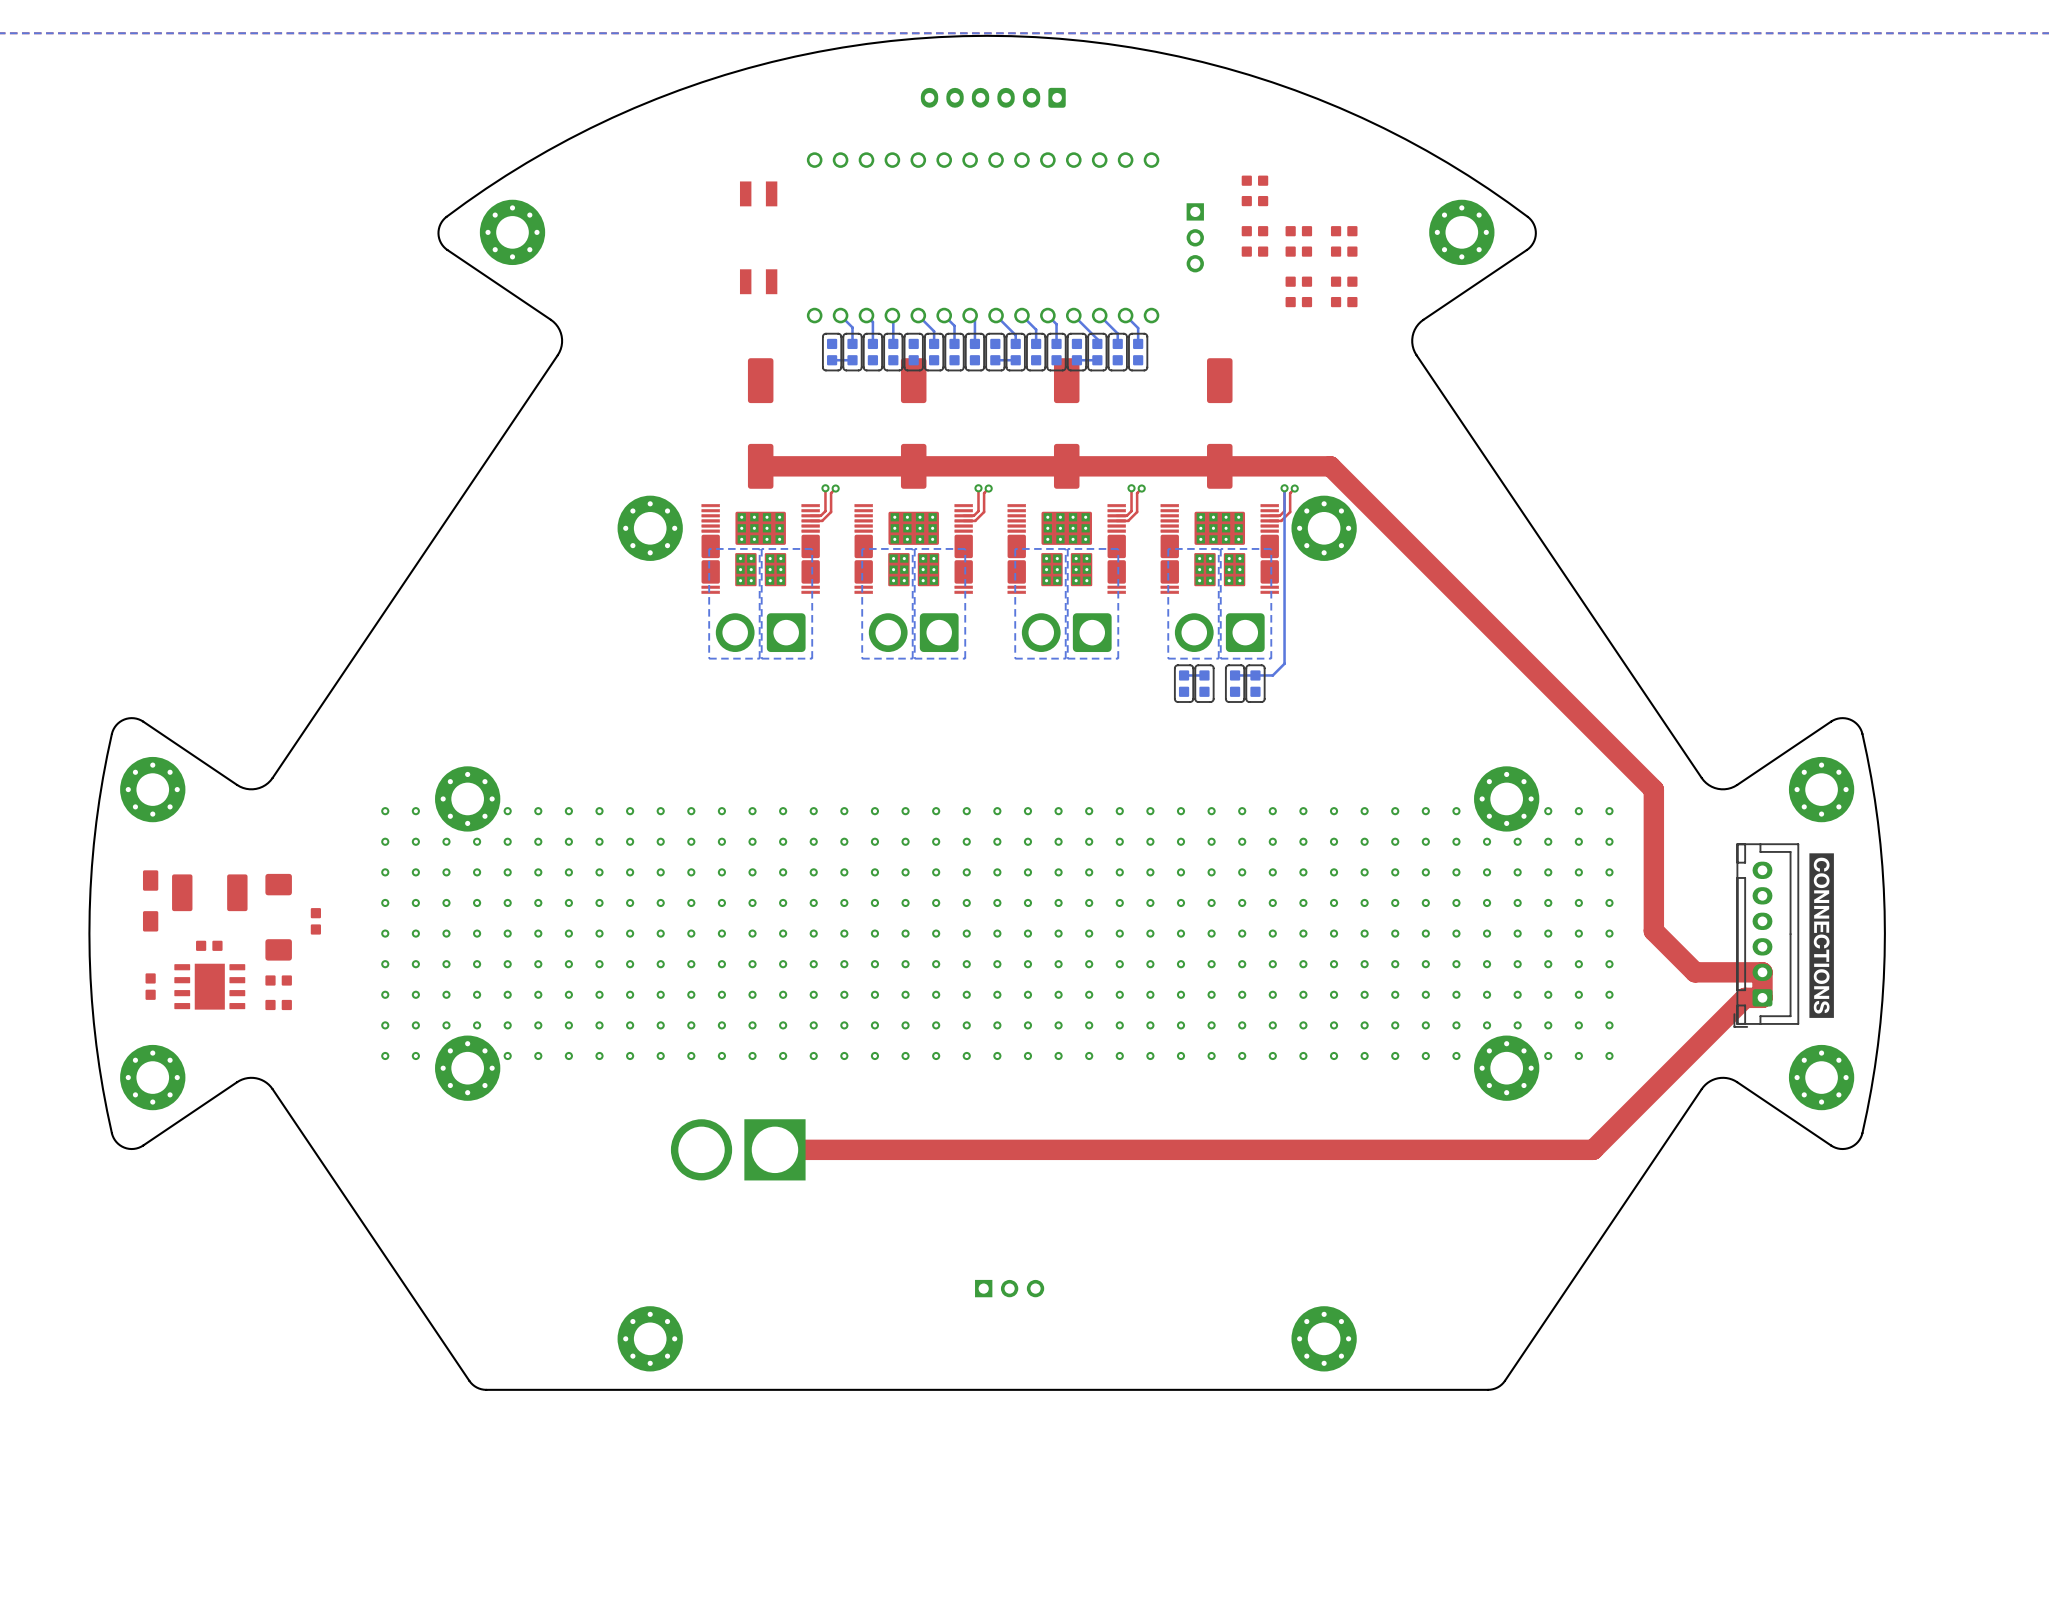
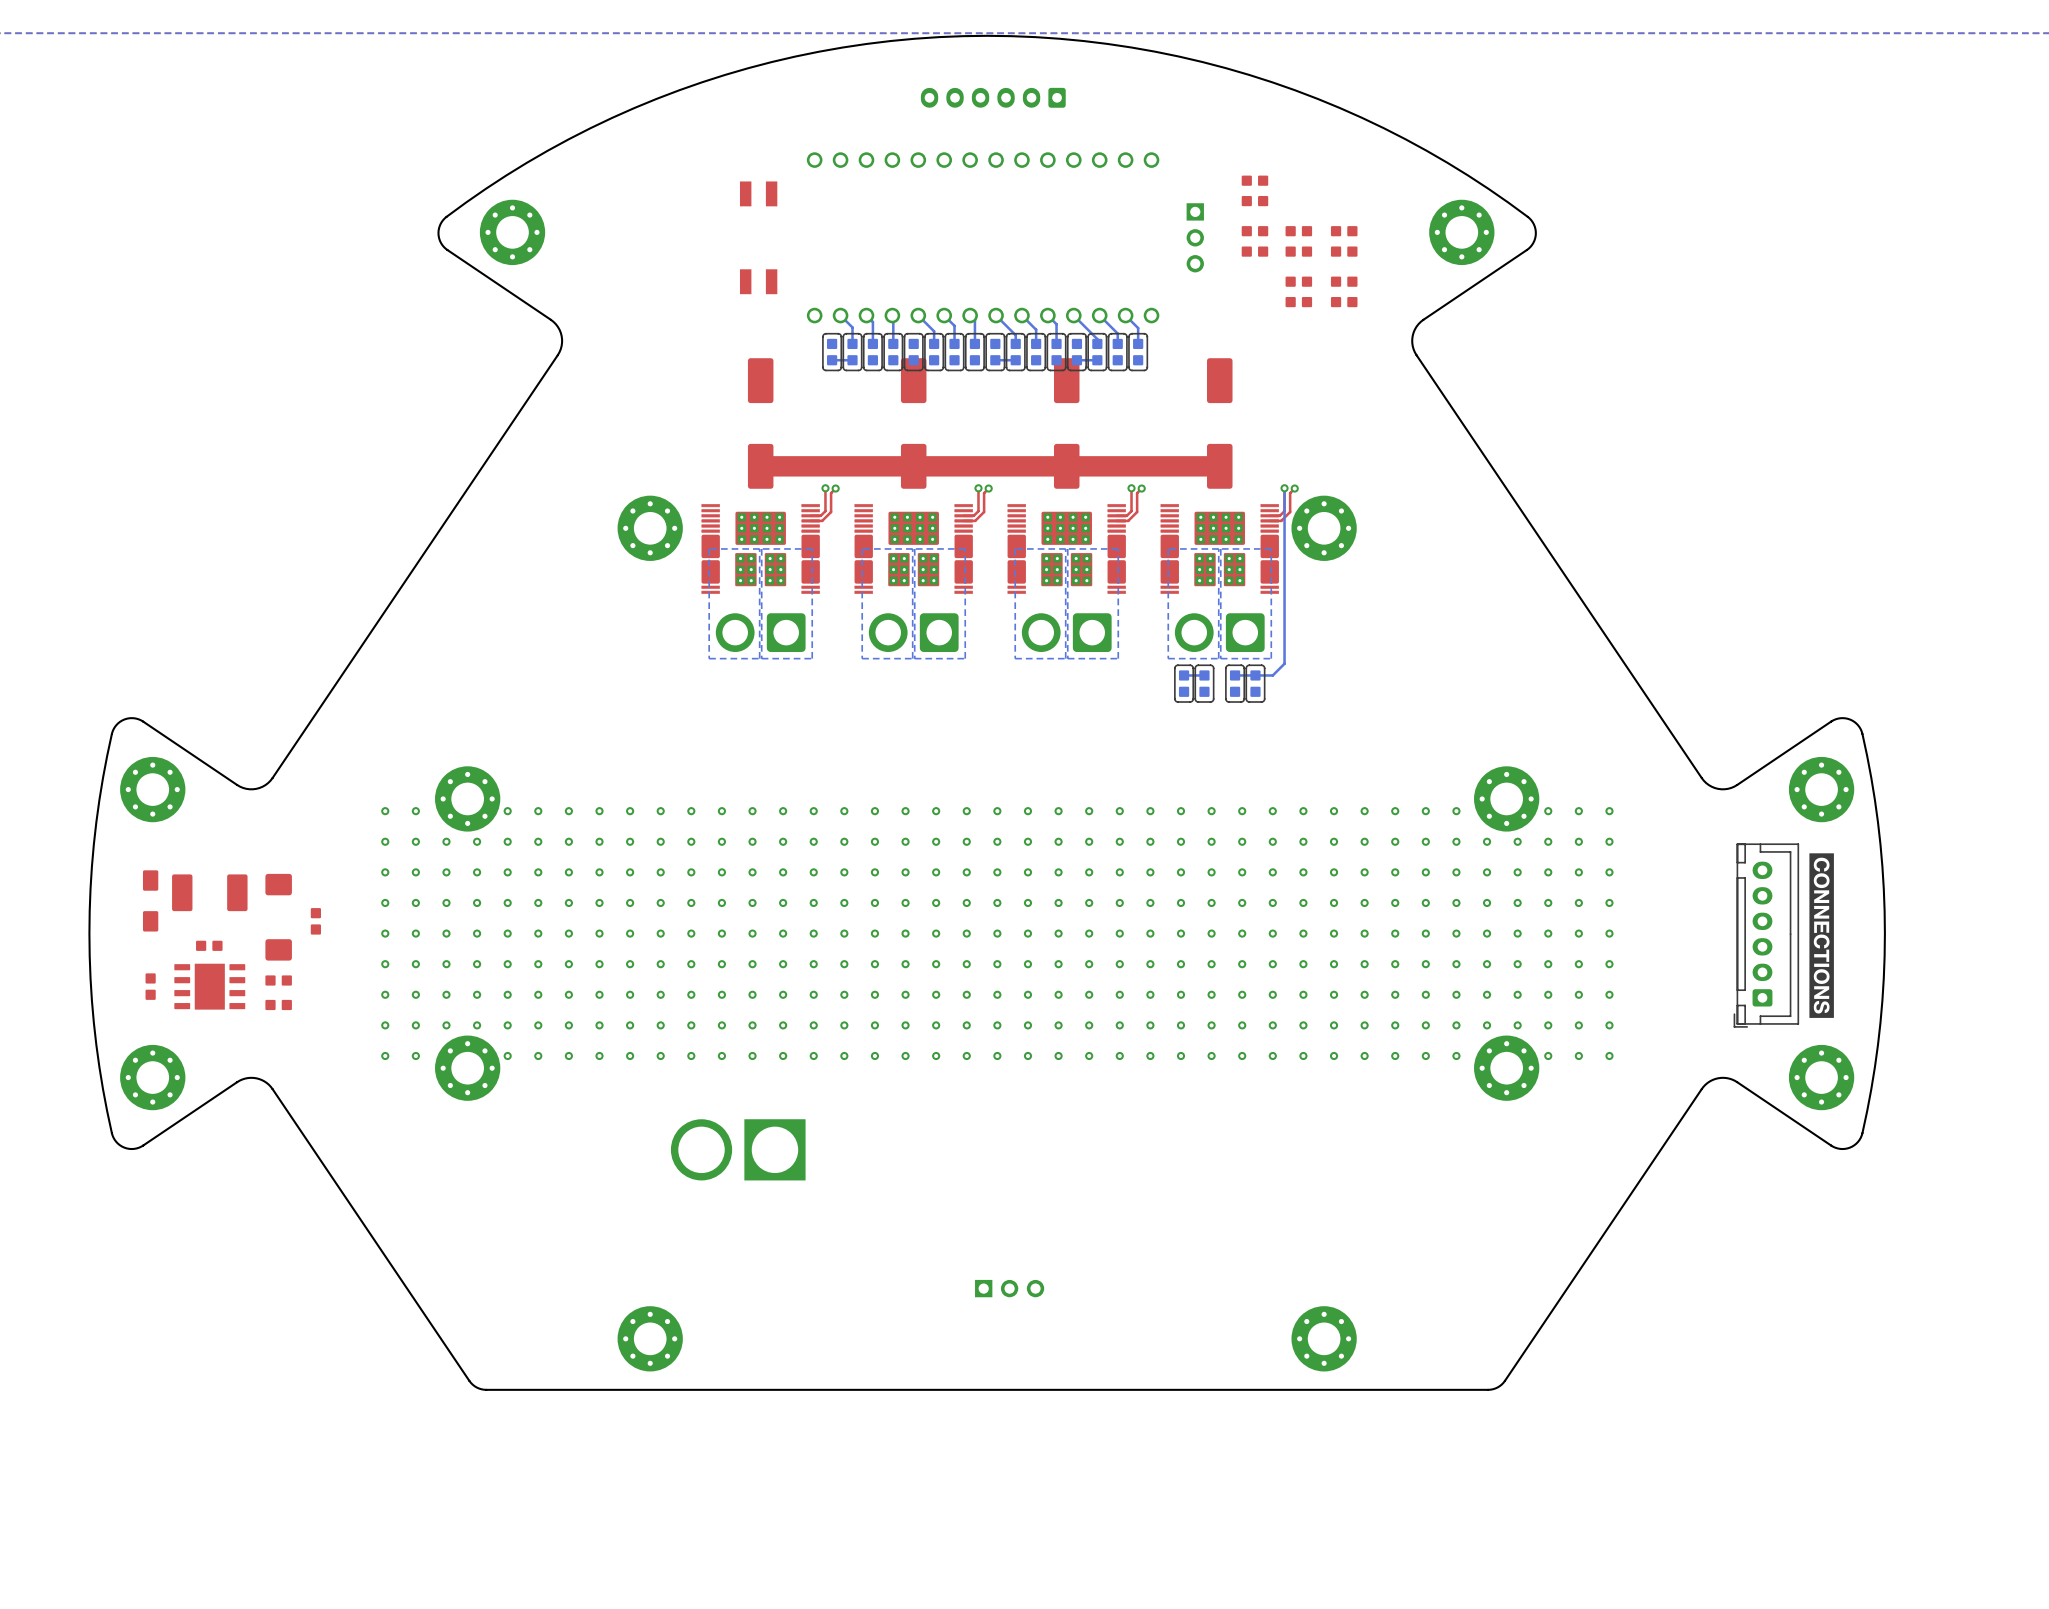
top track: (1219, 466) (1330, 466) (1653, 789) (1653, 931) (1695, 972) (1762, 972) (1762, 997) (1745, 997) (1593, 1149) (774, 1149) -> none

